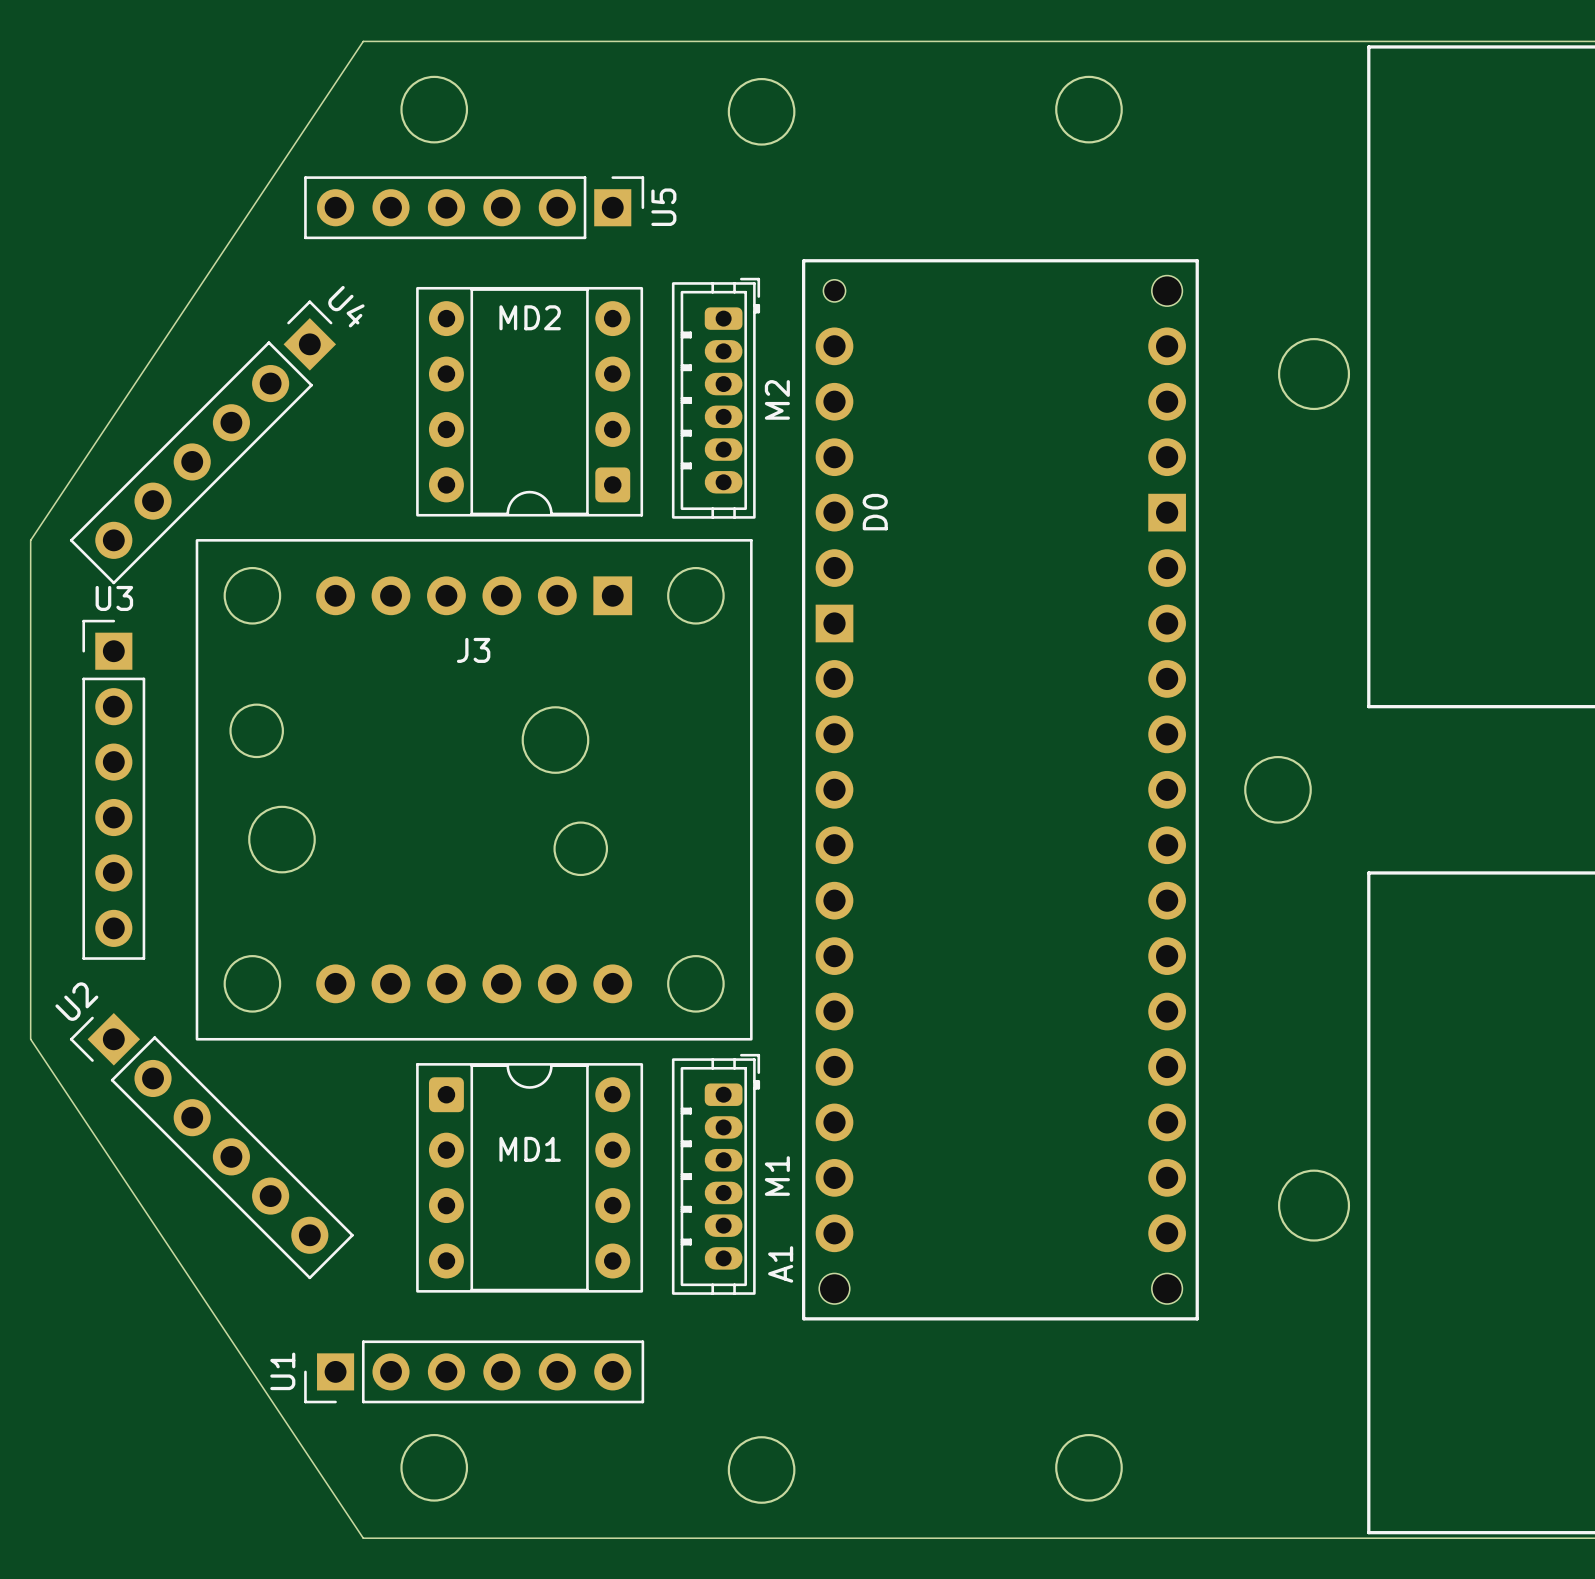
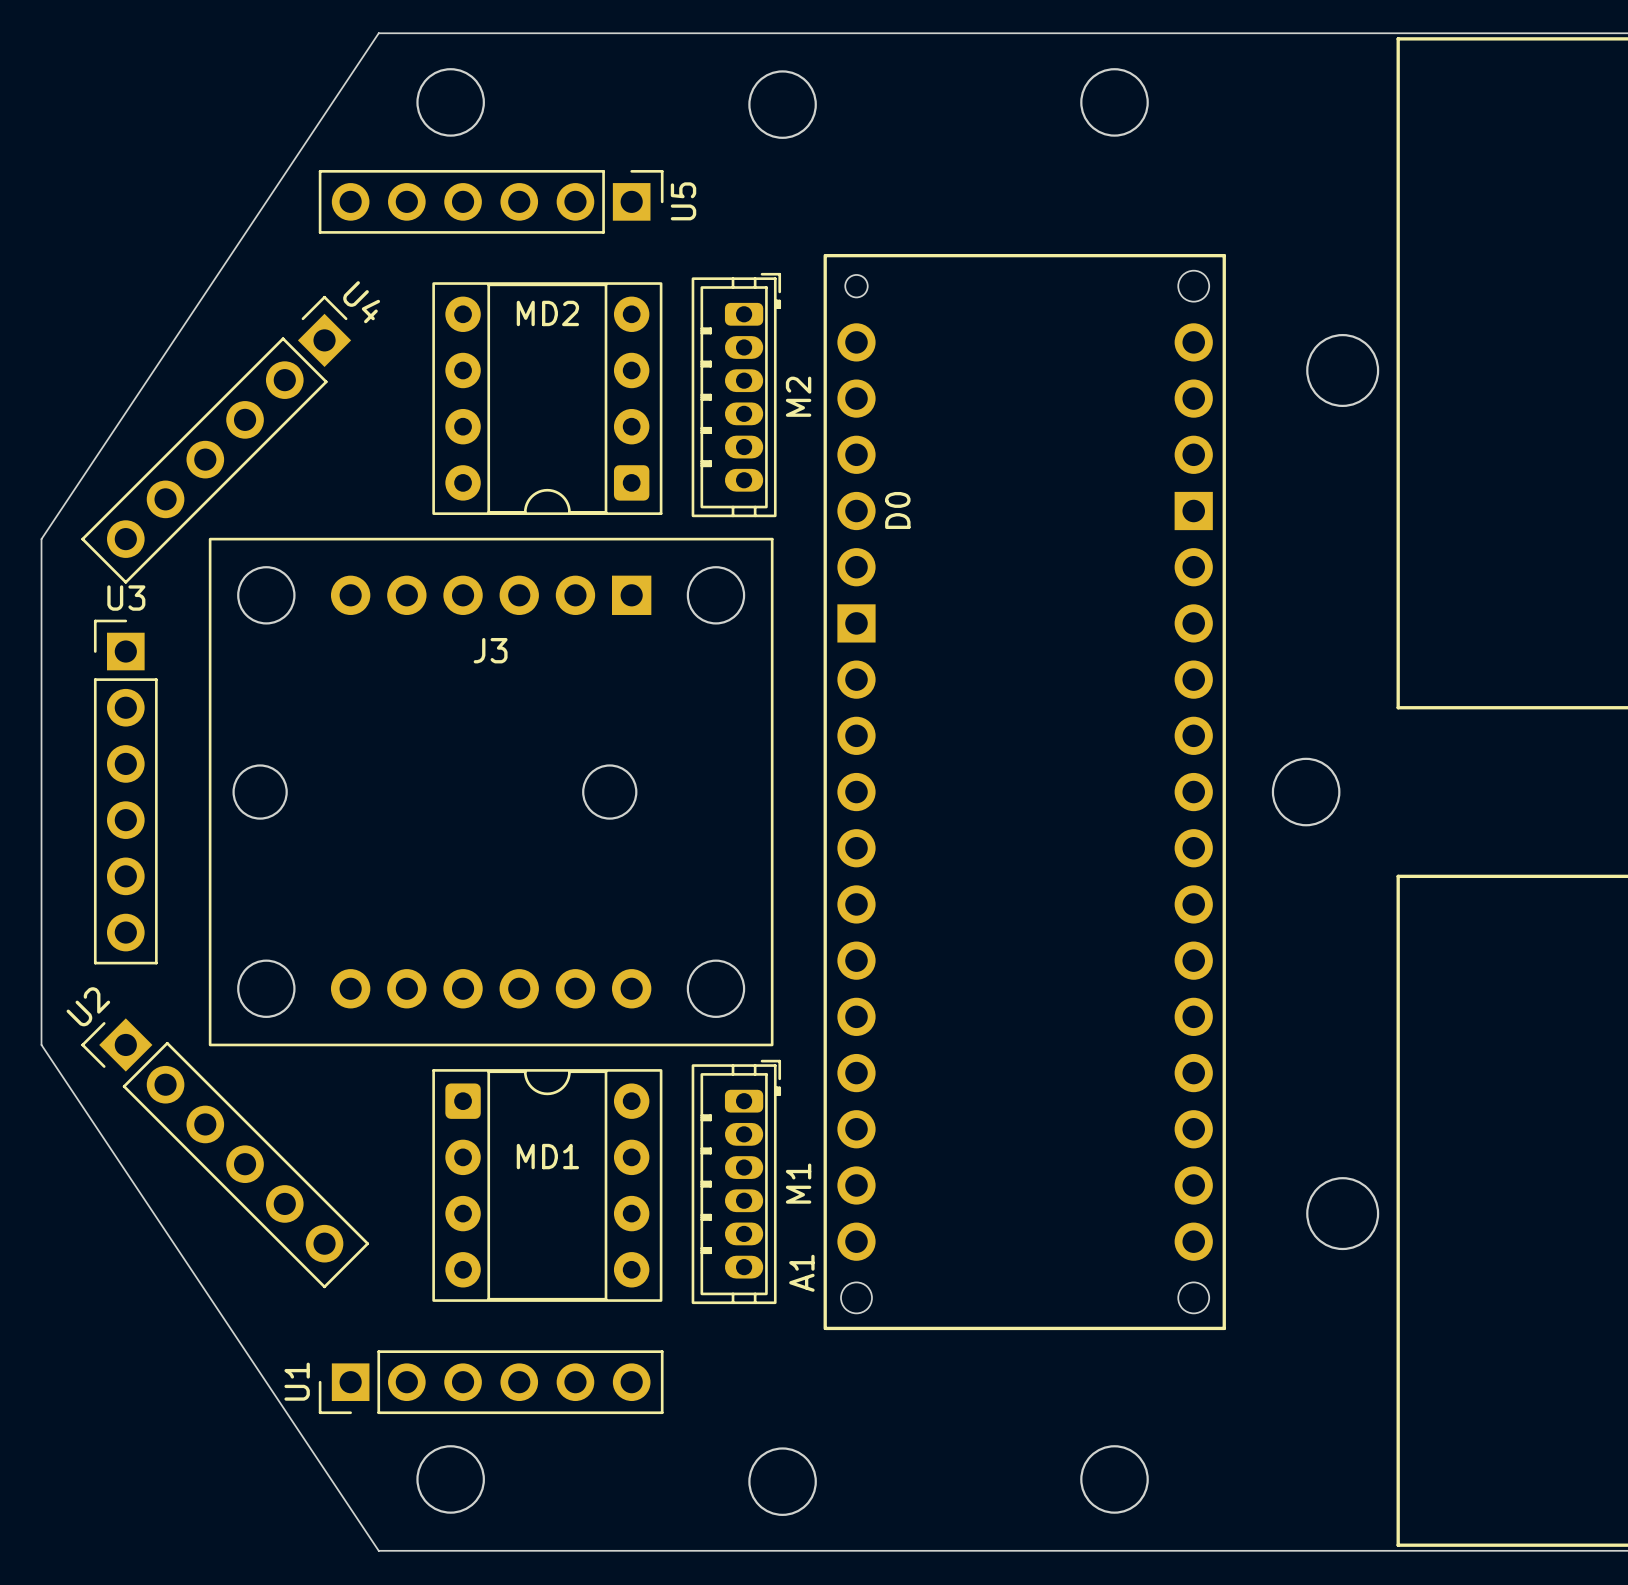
round board edge: [521, 706, 590, 774] -> none
round board edge position: (256, 730) -> (260, 792)
round board edge: [248, 805, 316, 874] -> none
round board edge position: (580, 848) -> (609, 792)

